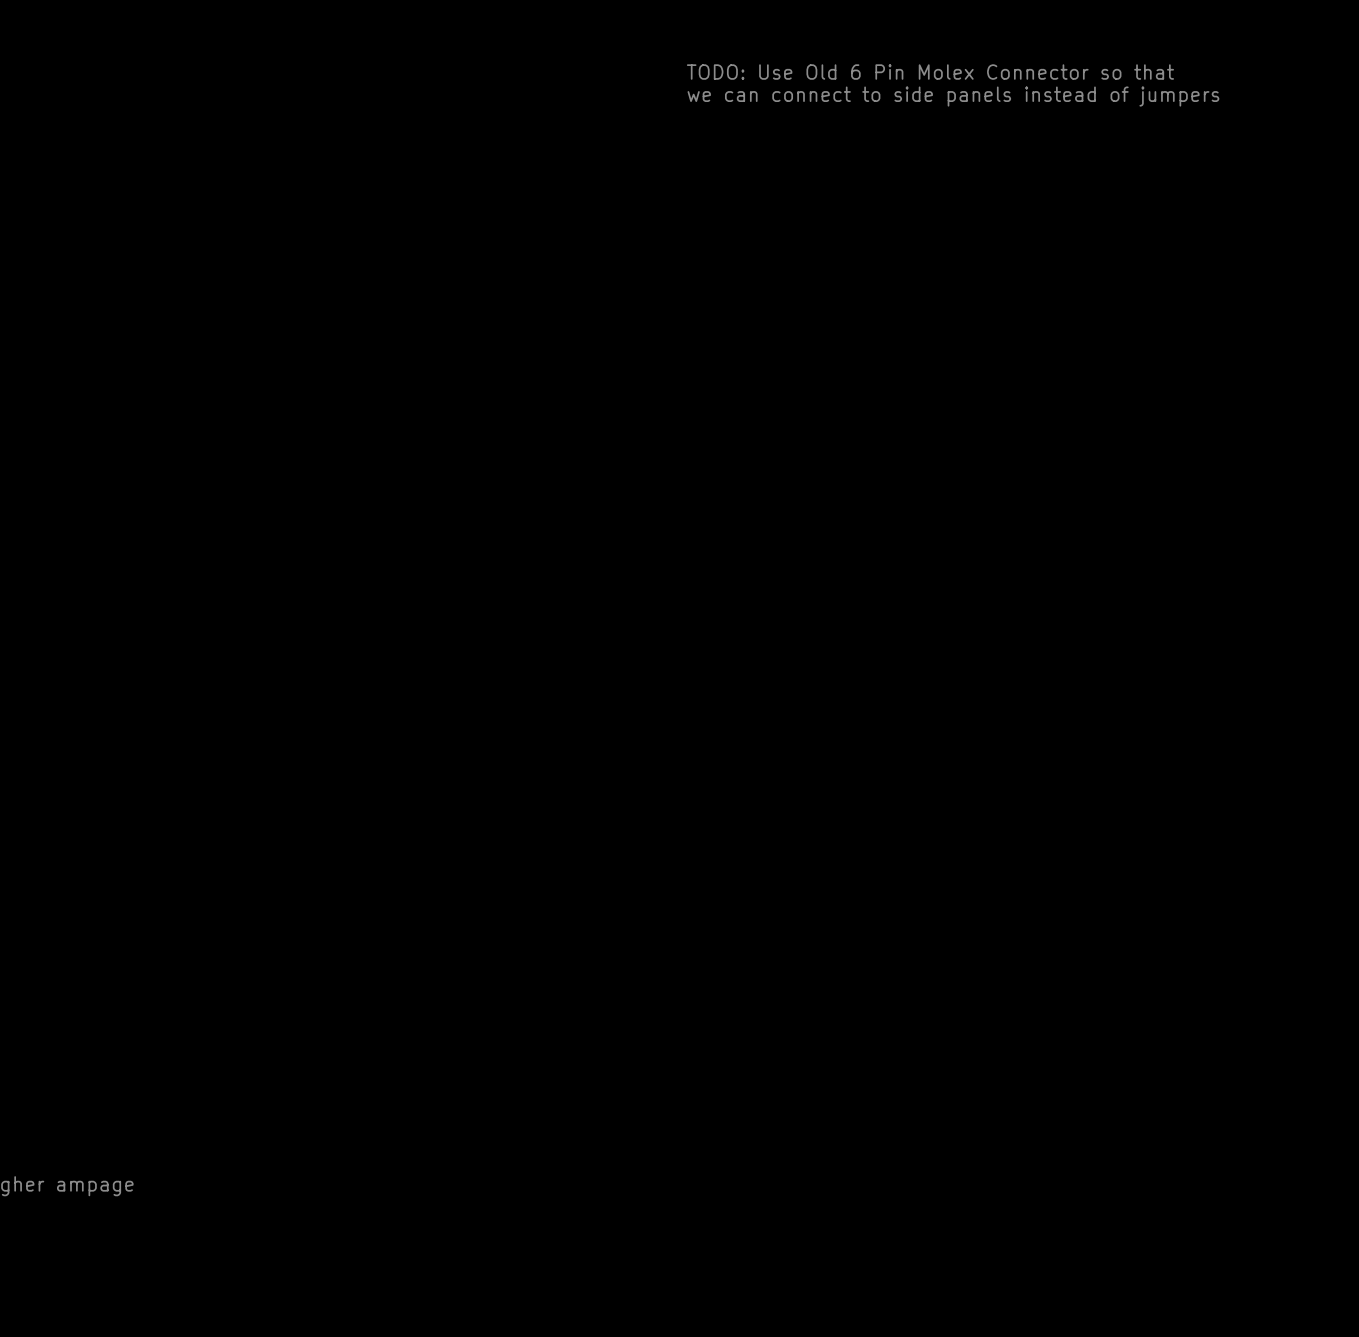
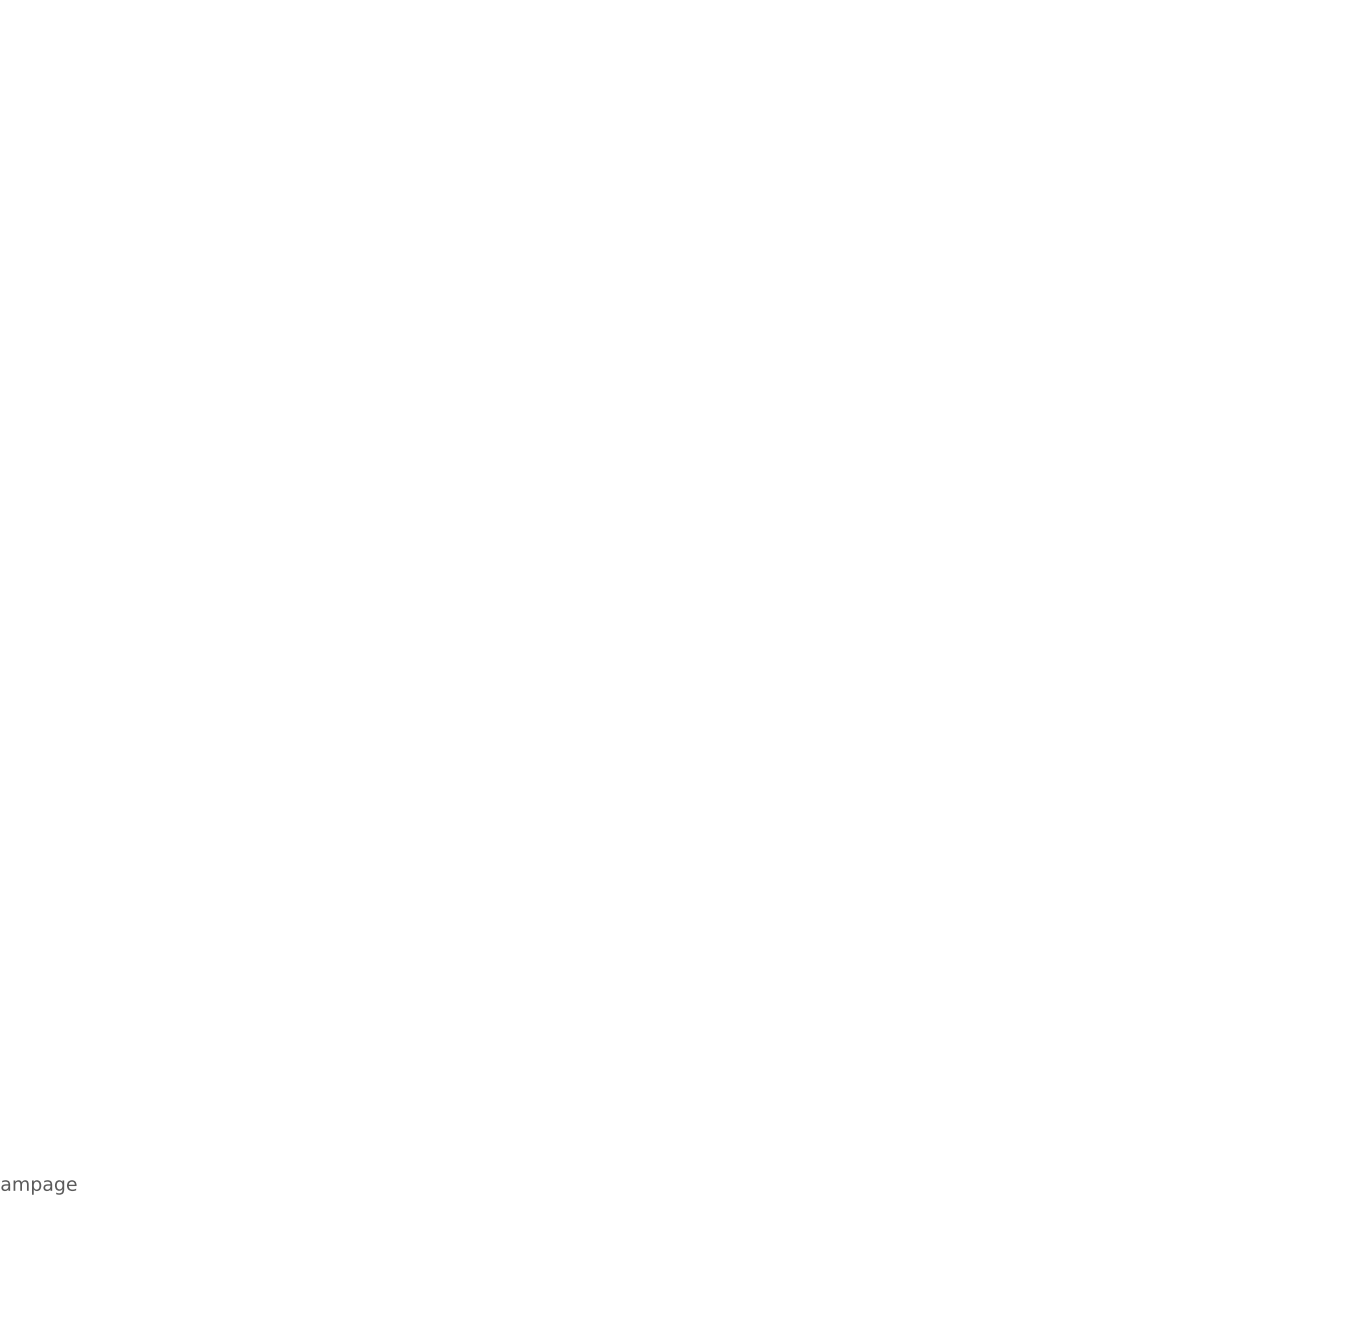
text: TODO: Use Old 6 Pin Molex Connector so that (930, 72) -> none
text: we can connect to side panels instead of jumpers (953, 96) -> none

